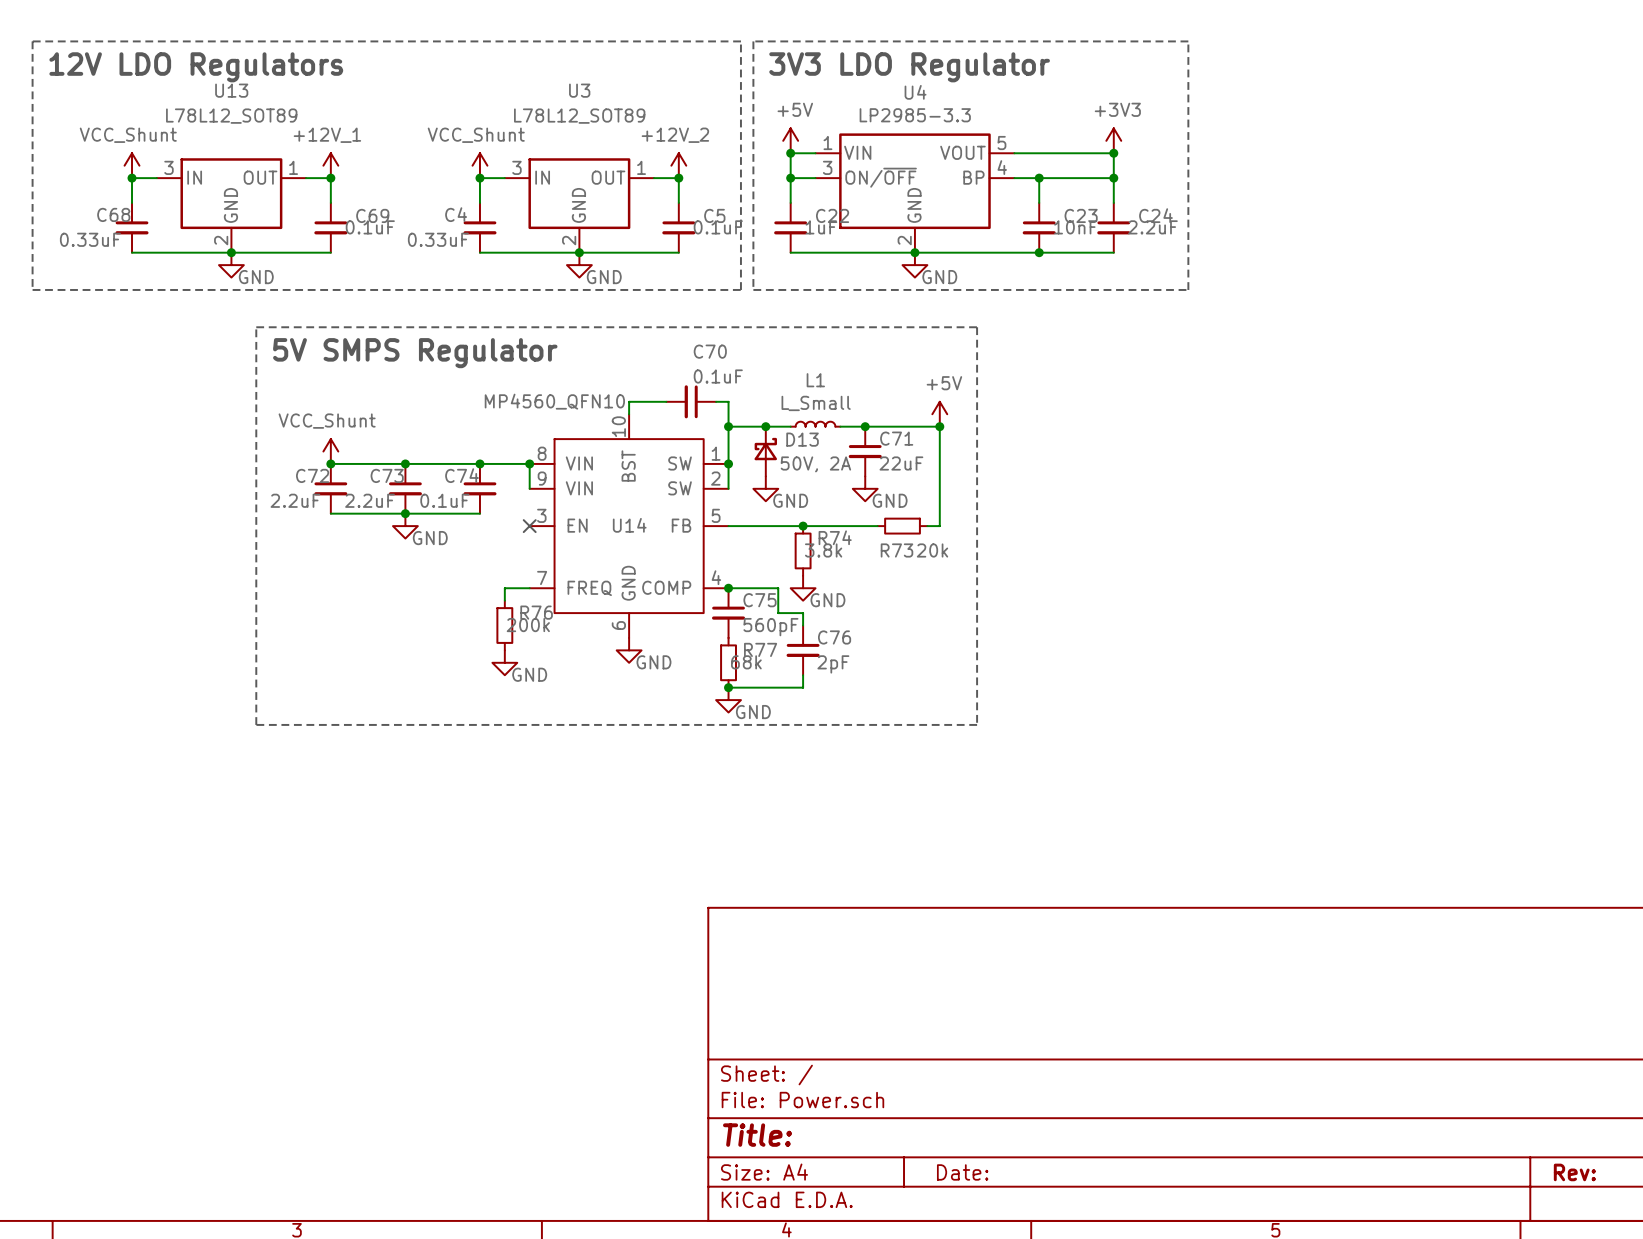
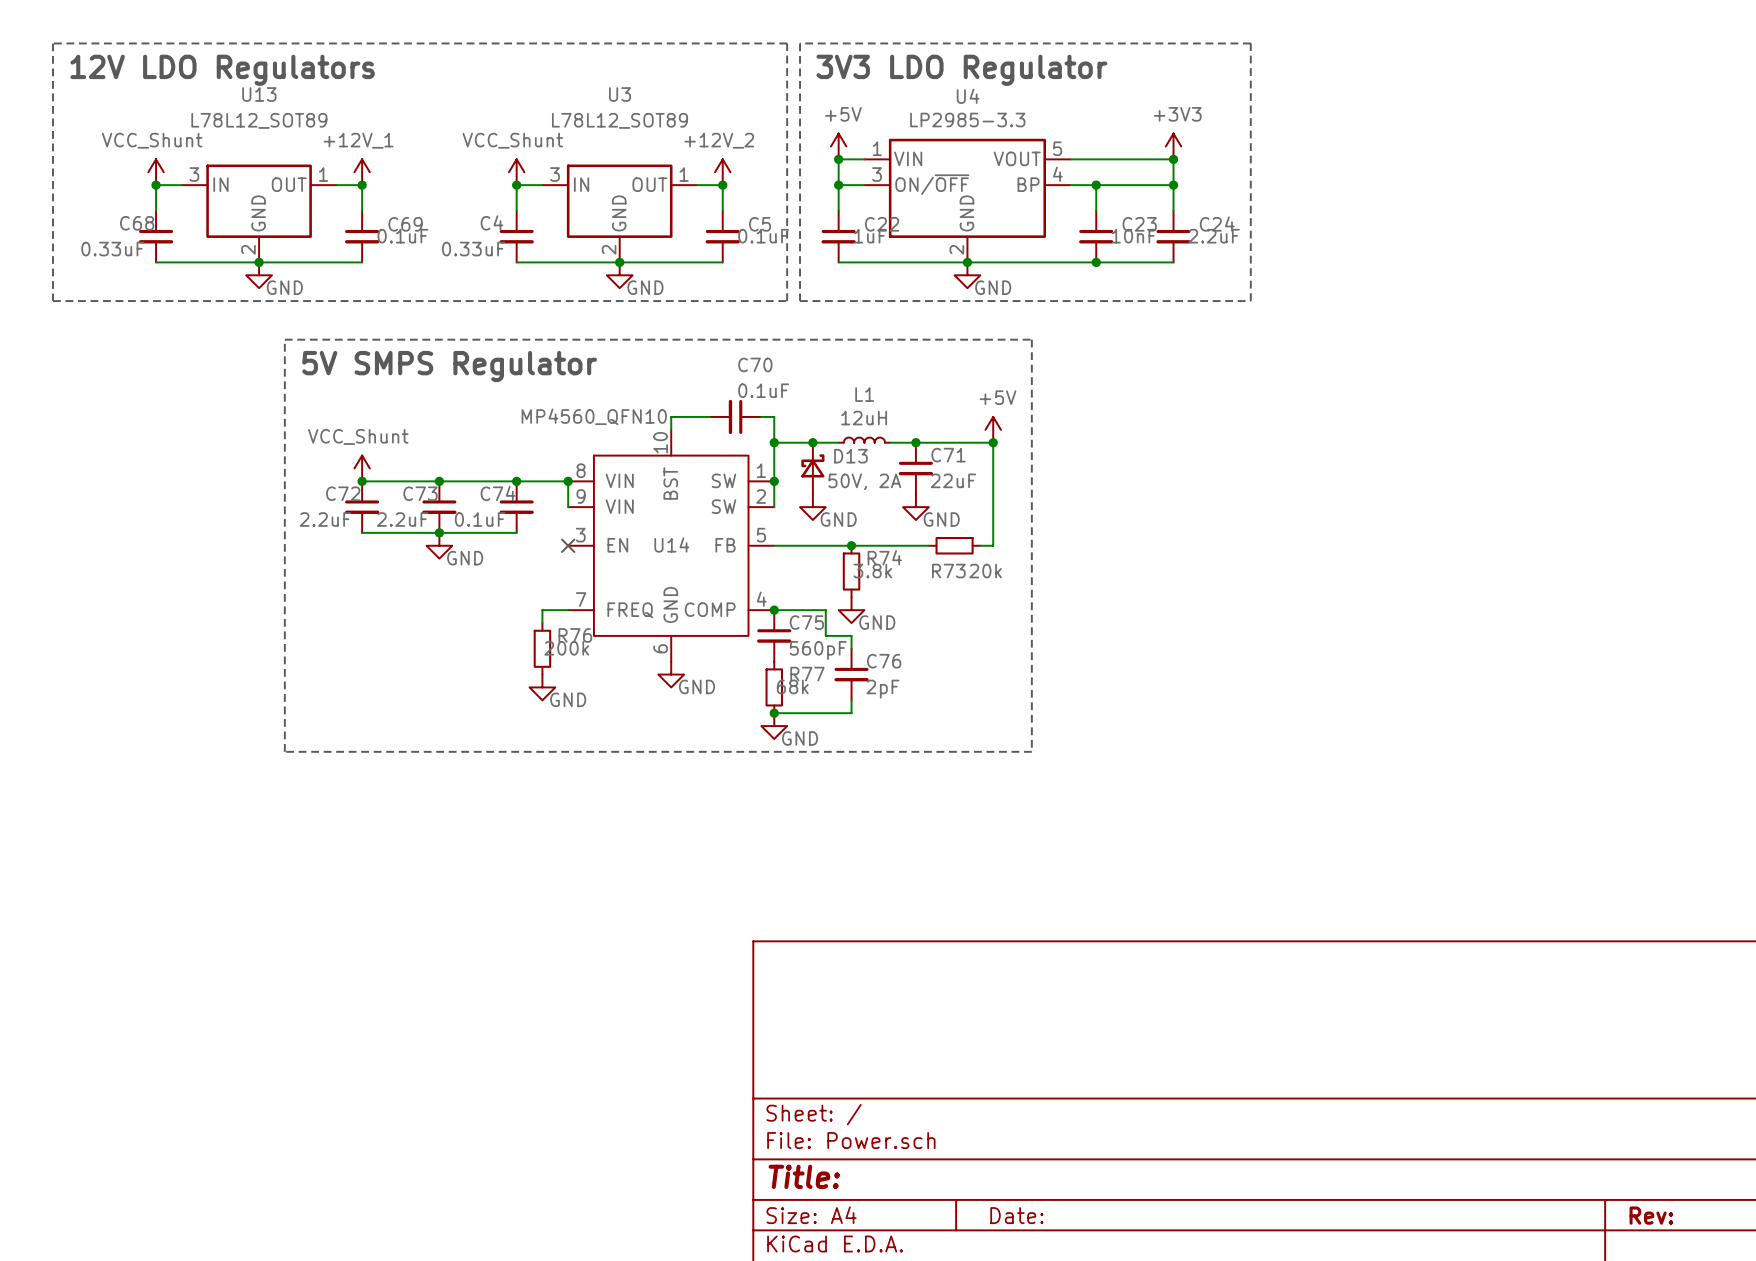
L1 value: L_Small (816, 403) -> 12uH (864, 418)

